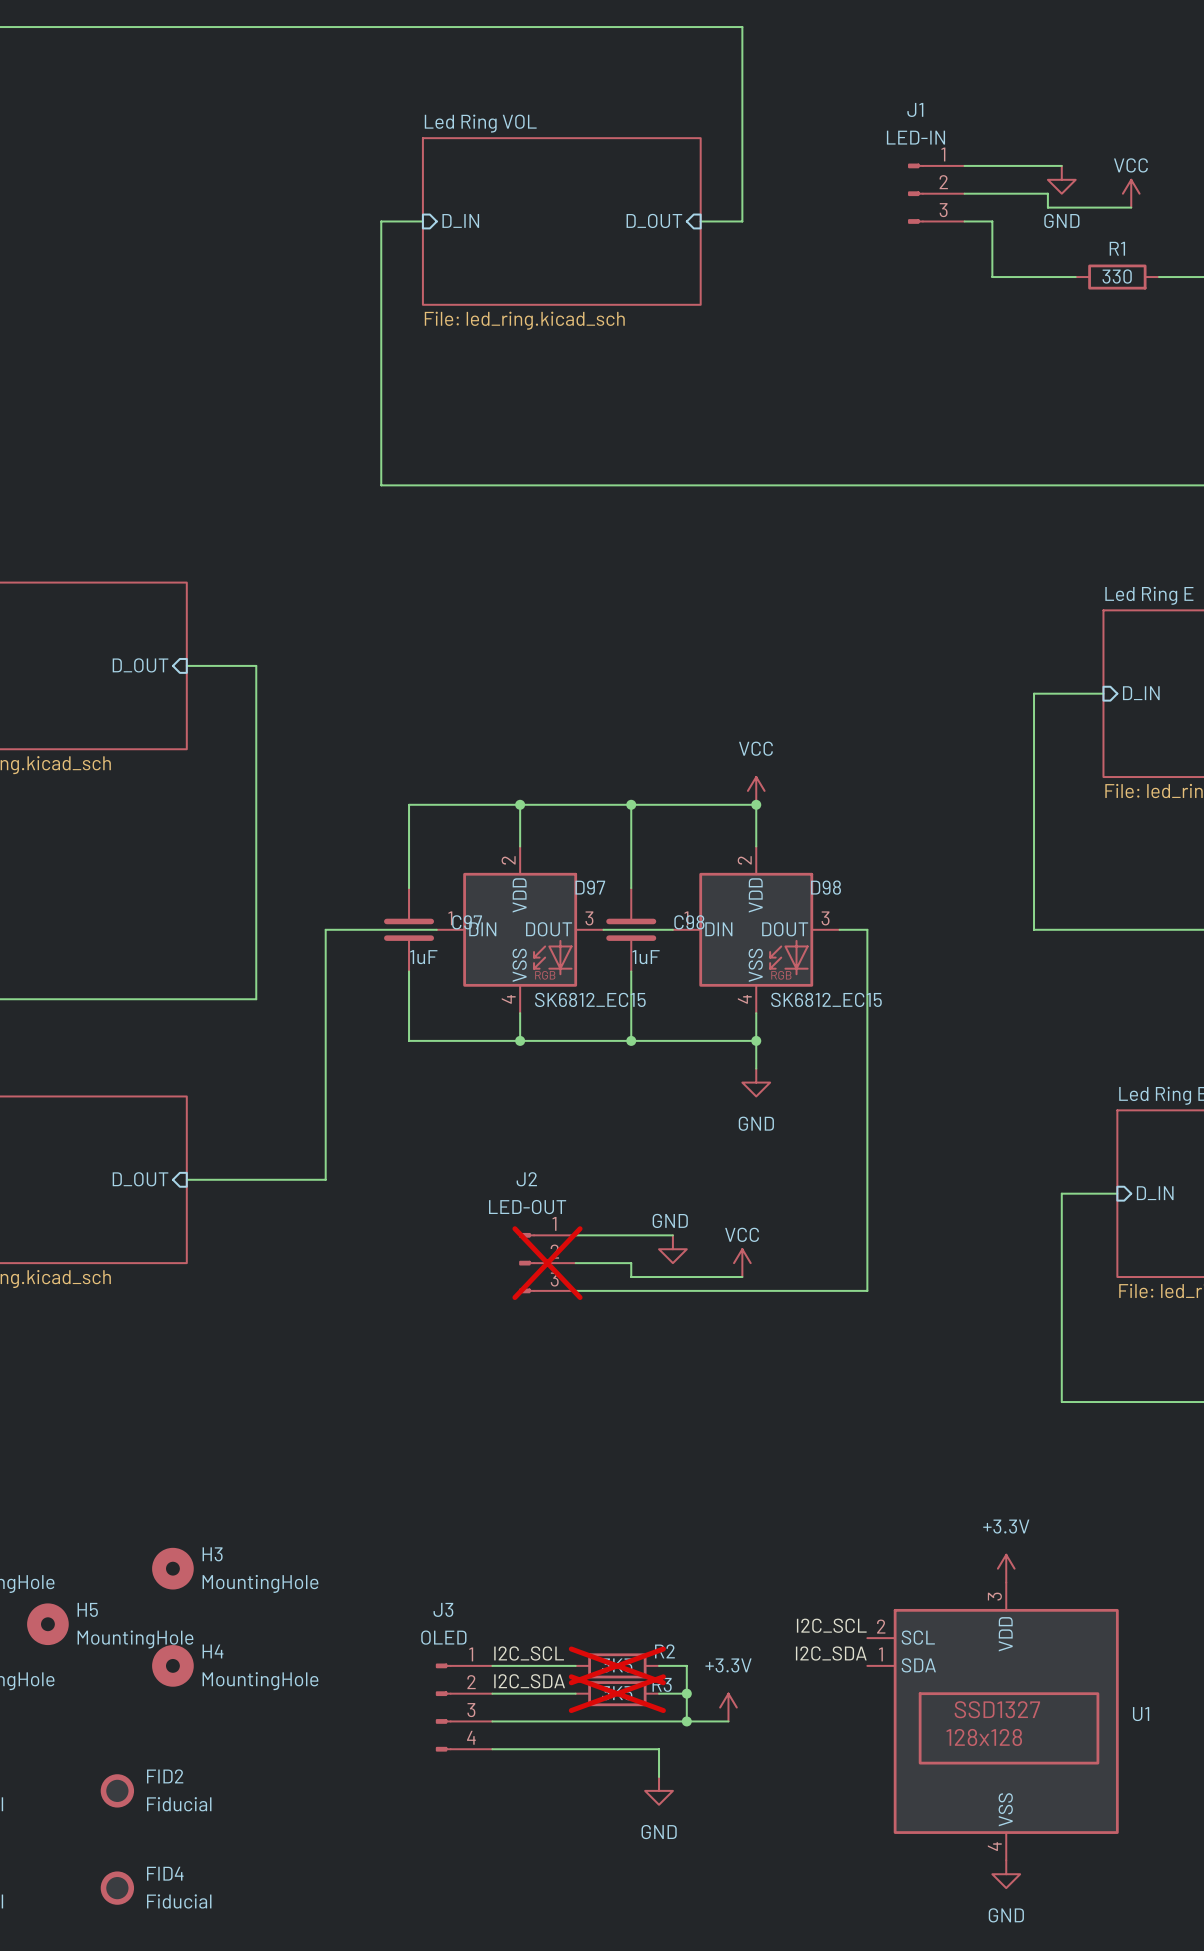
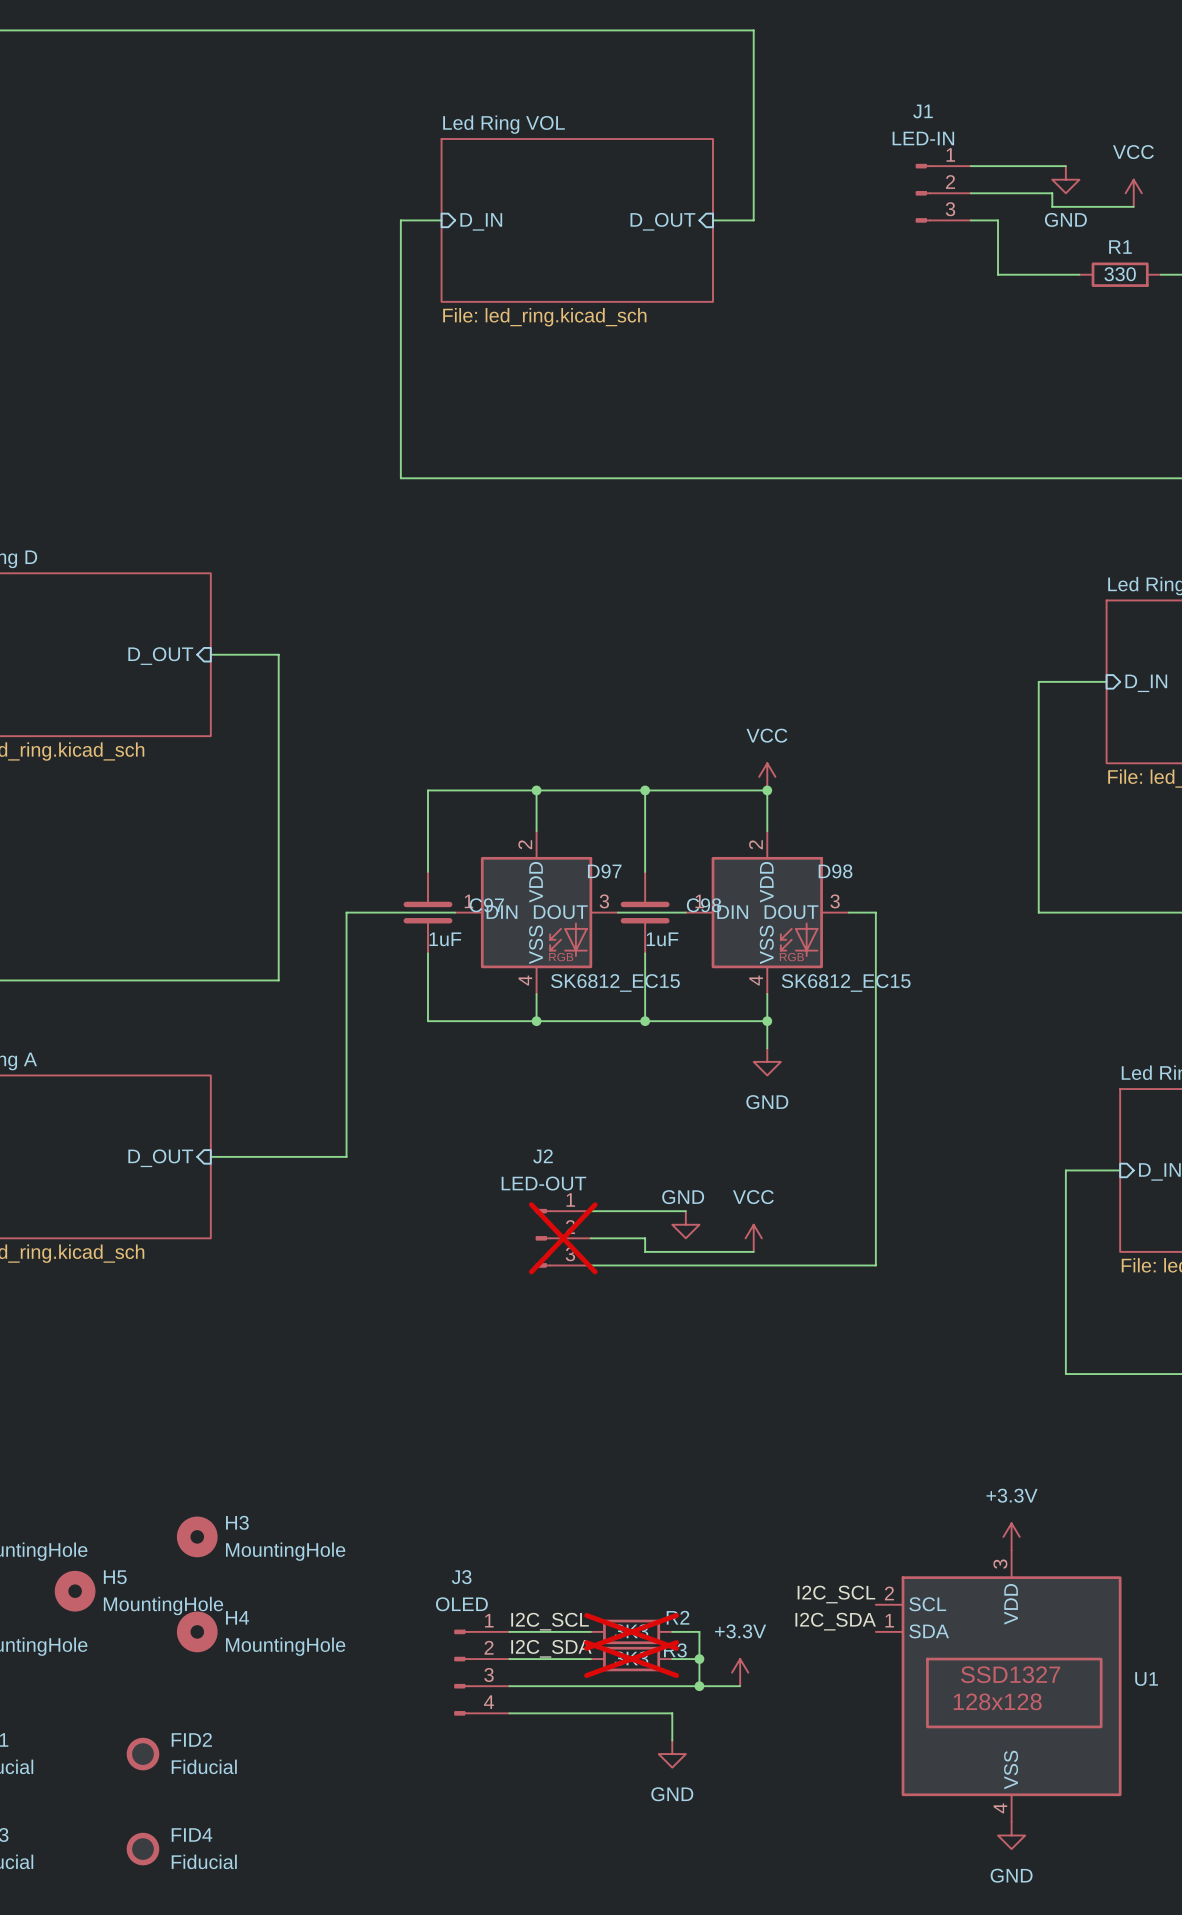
power symbol text position: VCC (1130, 165) -> VCC (1133, 152)
power symbol text position: VCC (742, 1234) -> VCC (753, 1197)

